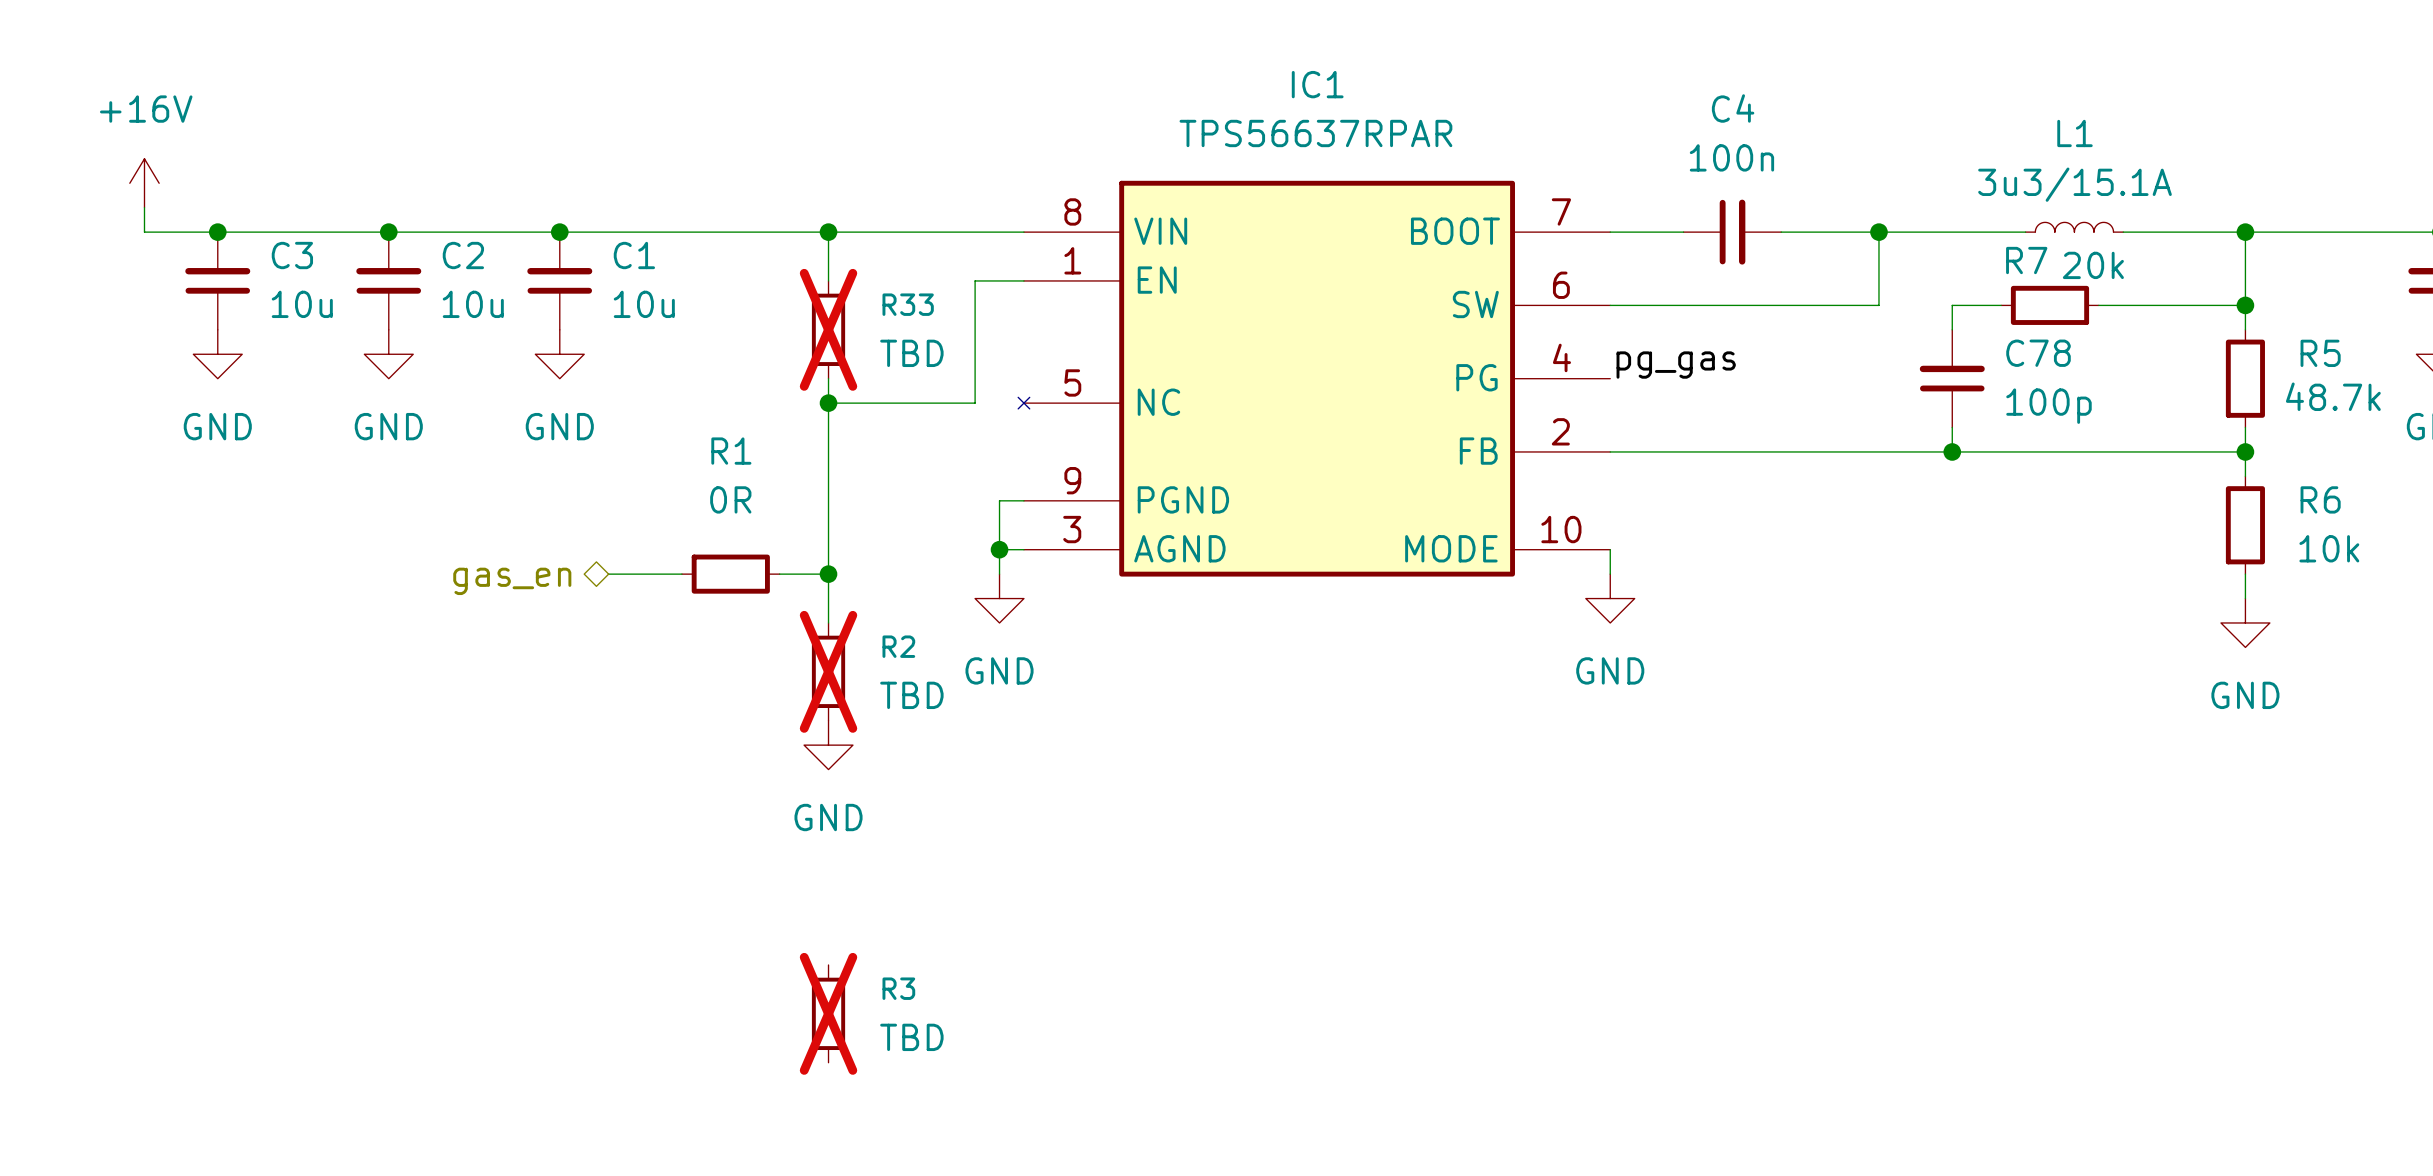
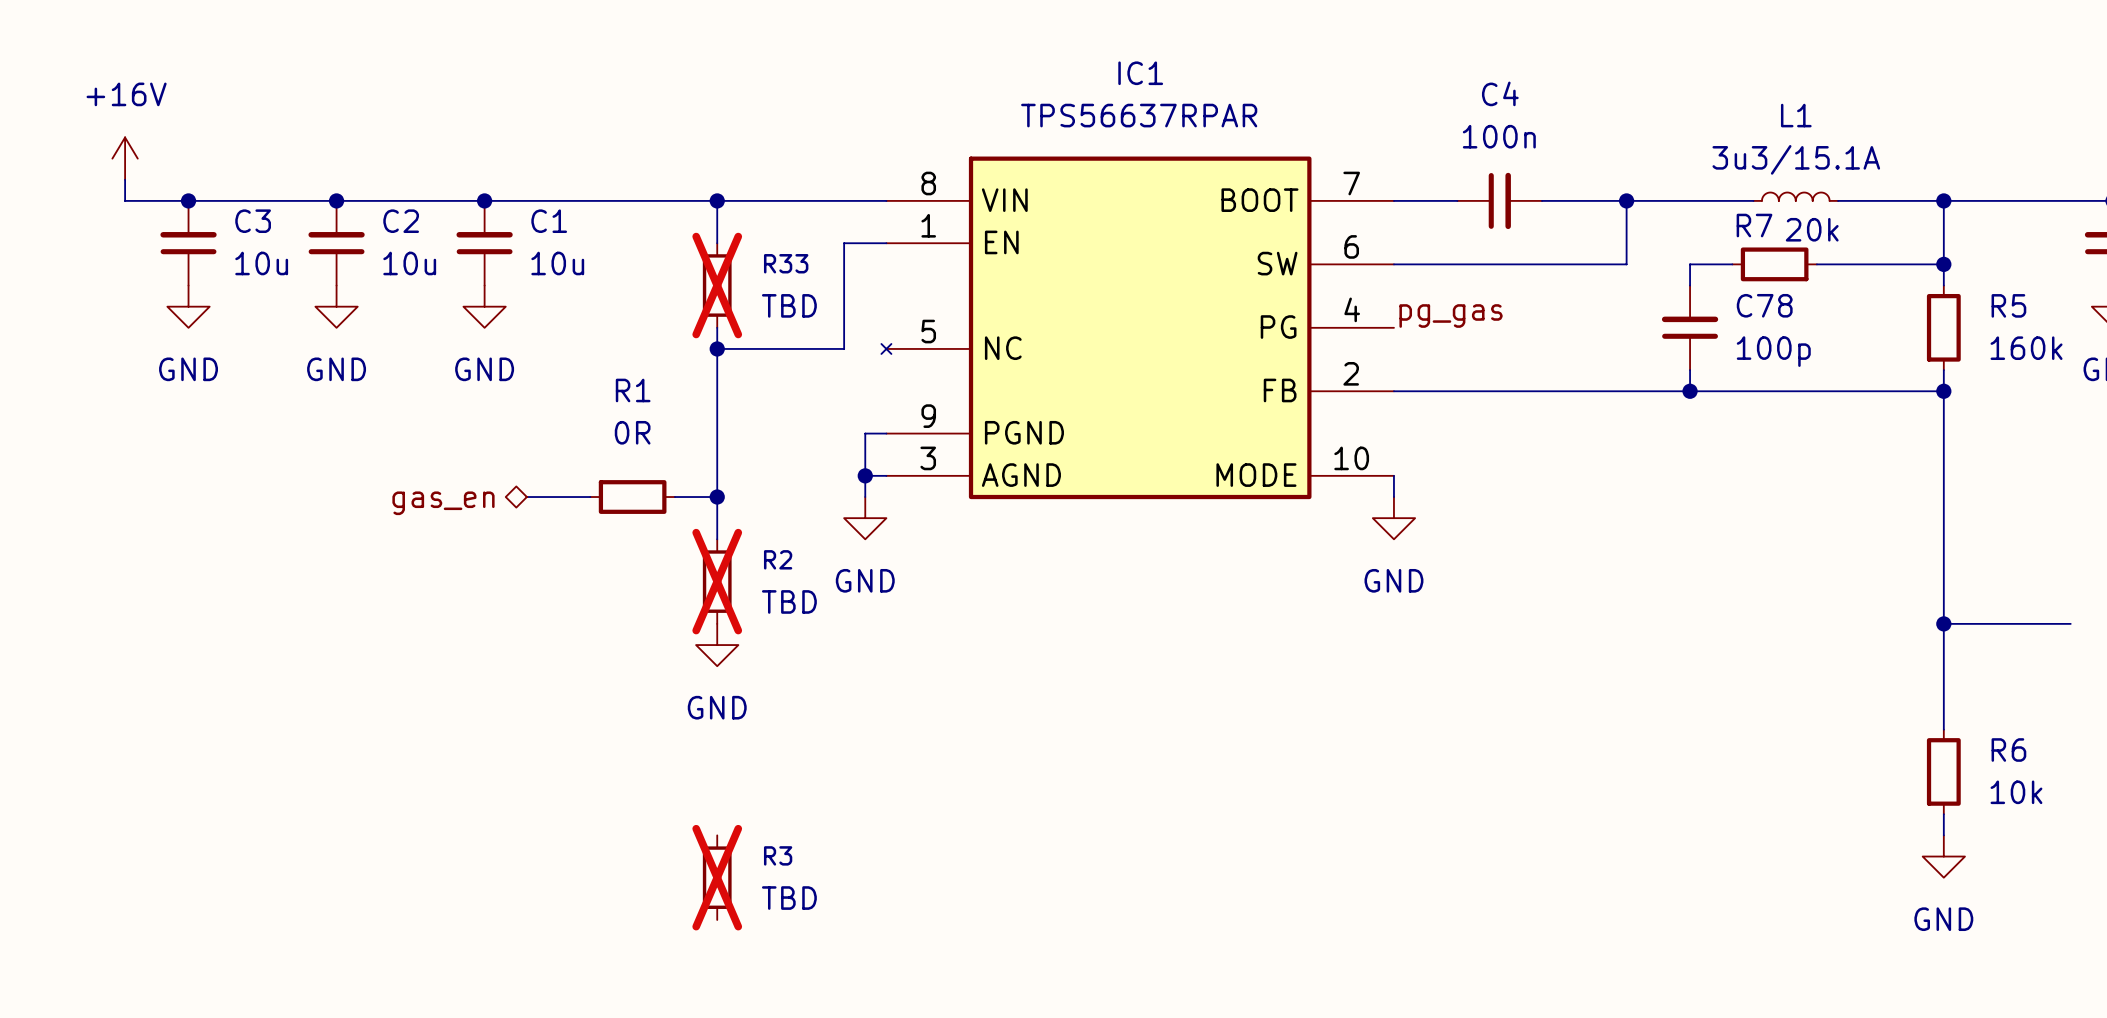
R5 text: 48.7k (2333, 396) -> 160k (2026, 348)
wire: none -> (1943, 412) (1943, 497)
R6 position: (2245, 525) -> (1943, 771)
wire: none -> (1943, 518) (1943, 729)
power symbol: GND (2245, 622) -> none
wire: none -> (1943, 623) (2070, 623)
junction: none -> (1943, 623)
wire: none -> (1943, 814) (1943, 835)
power symbol: none -> GND (1943, 856)

